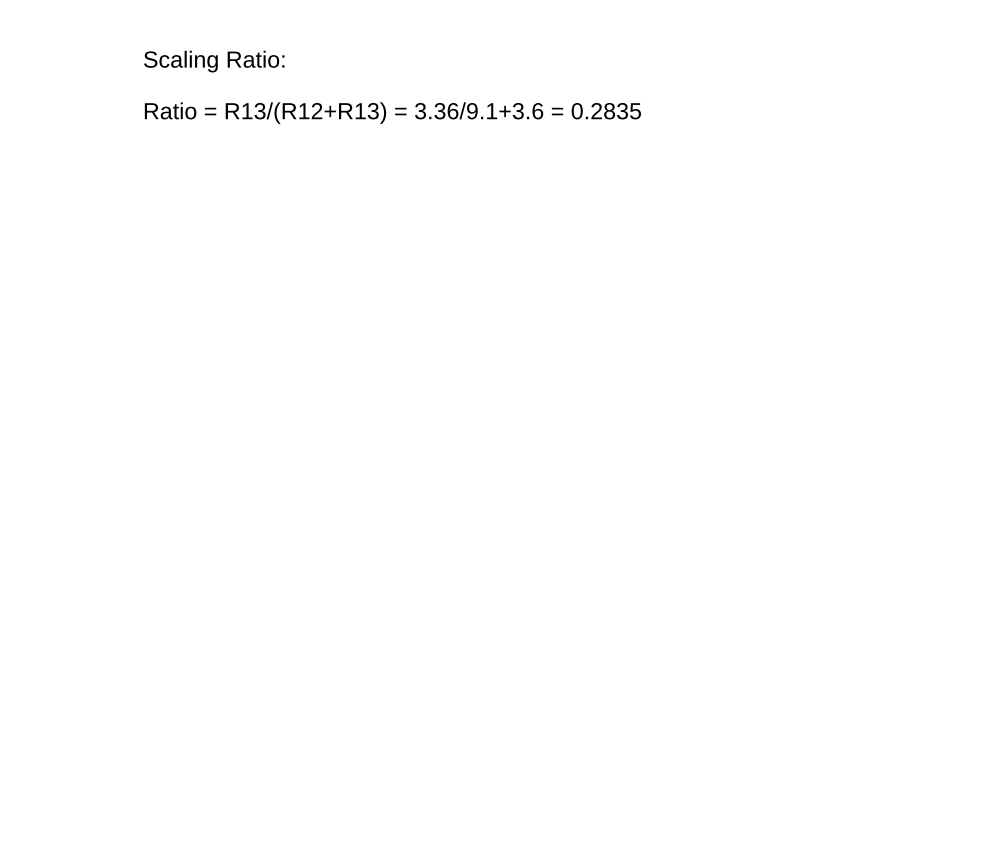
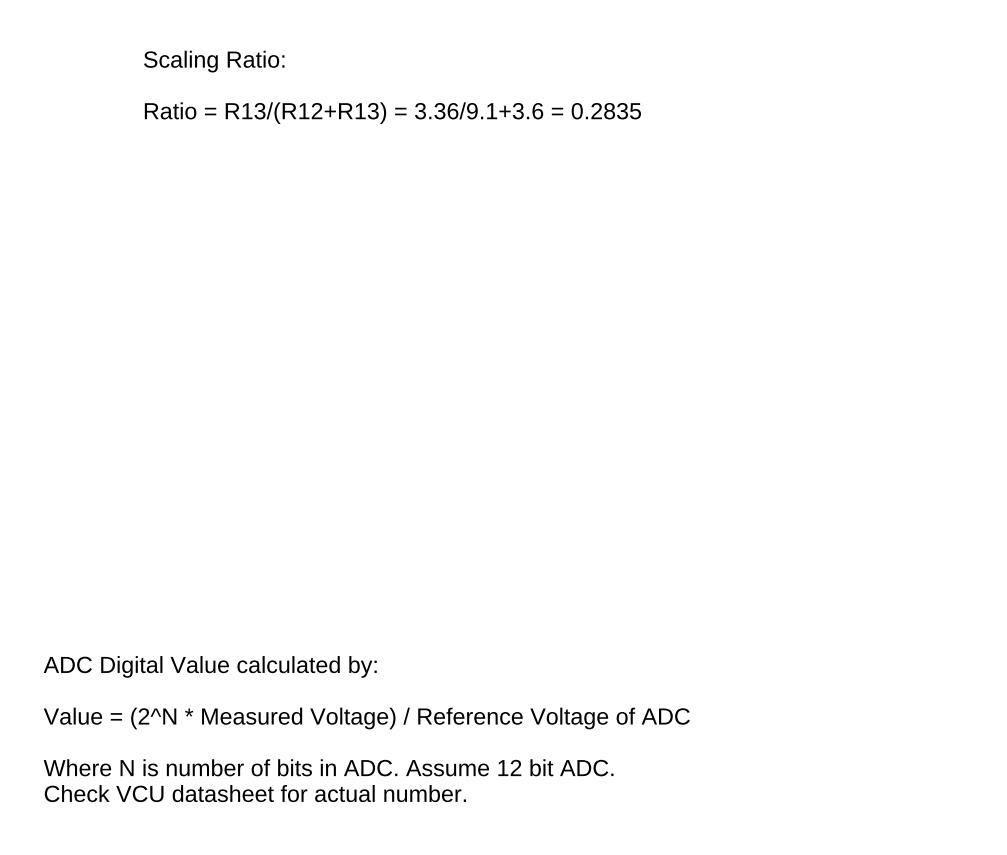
text: none -> ADC Digital Value calculated by: (210, 666)
text: none -> Value = (2^N * Measured Voltage) / Reference Voltage of ADC (366, 718)
text: none -> Where N is number of bits in ADC. Assume 12 bit ADC. (328, 767)
text: none -> Check VCU datasheet for actual number. (255, 793)

